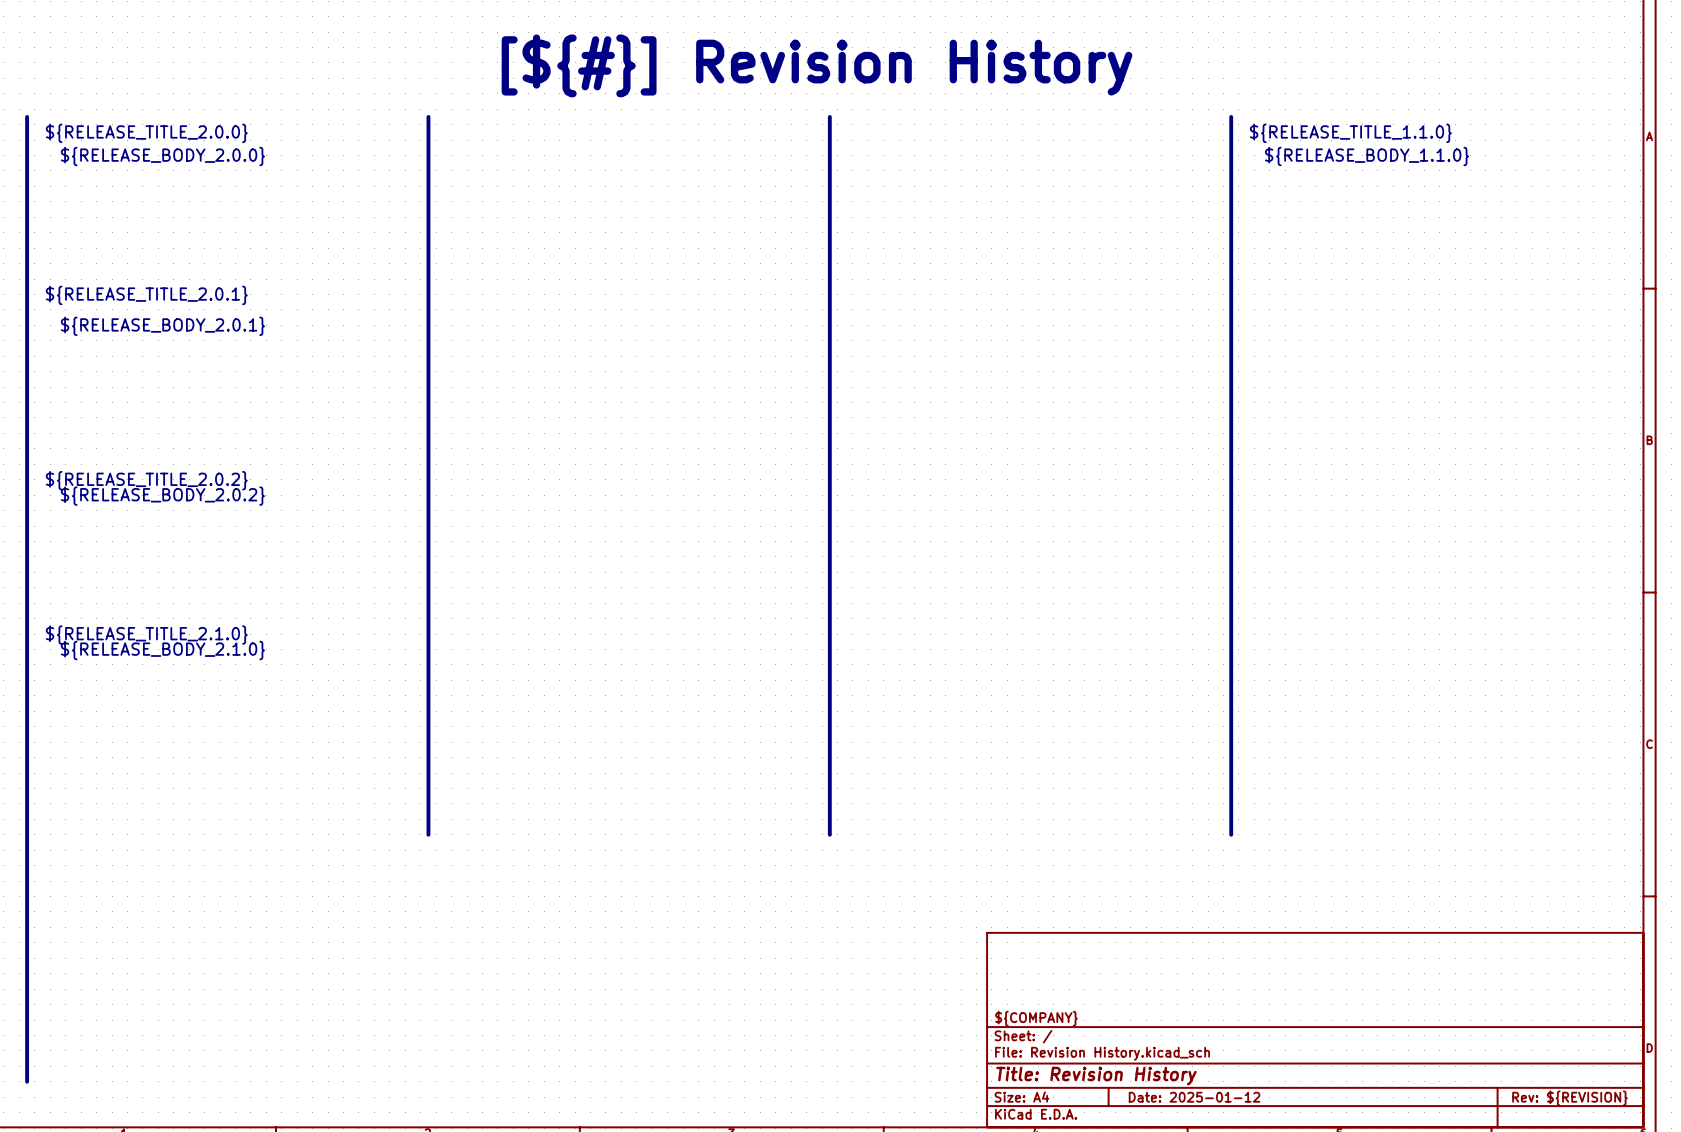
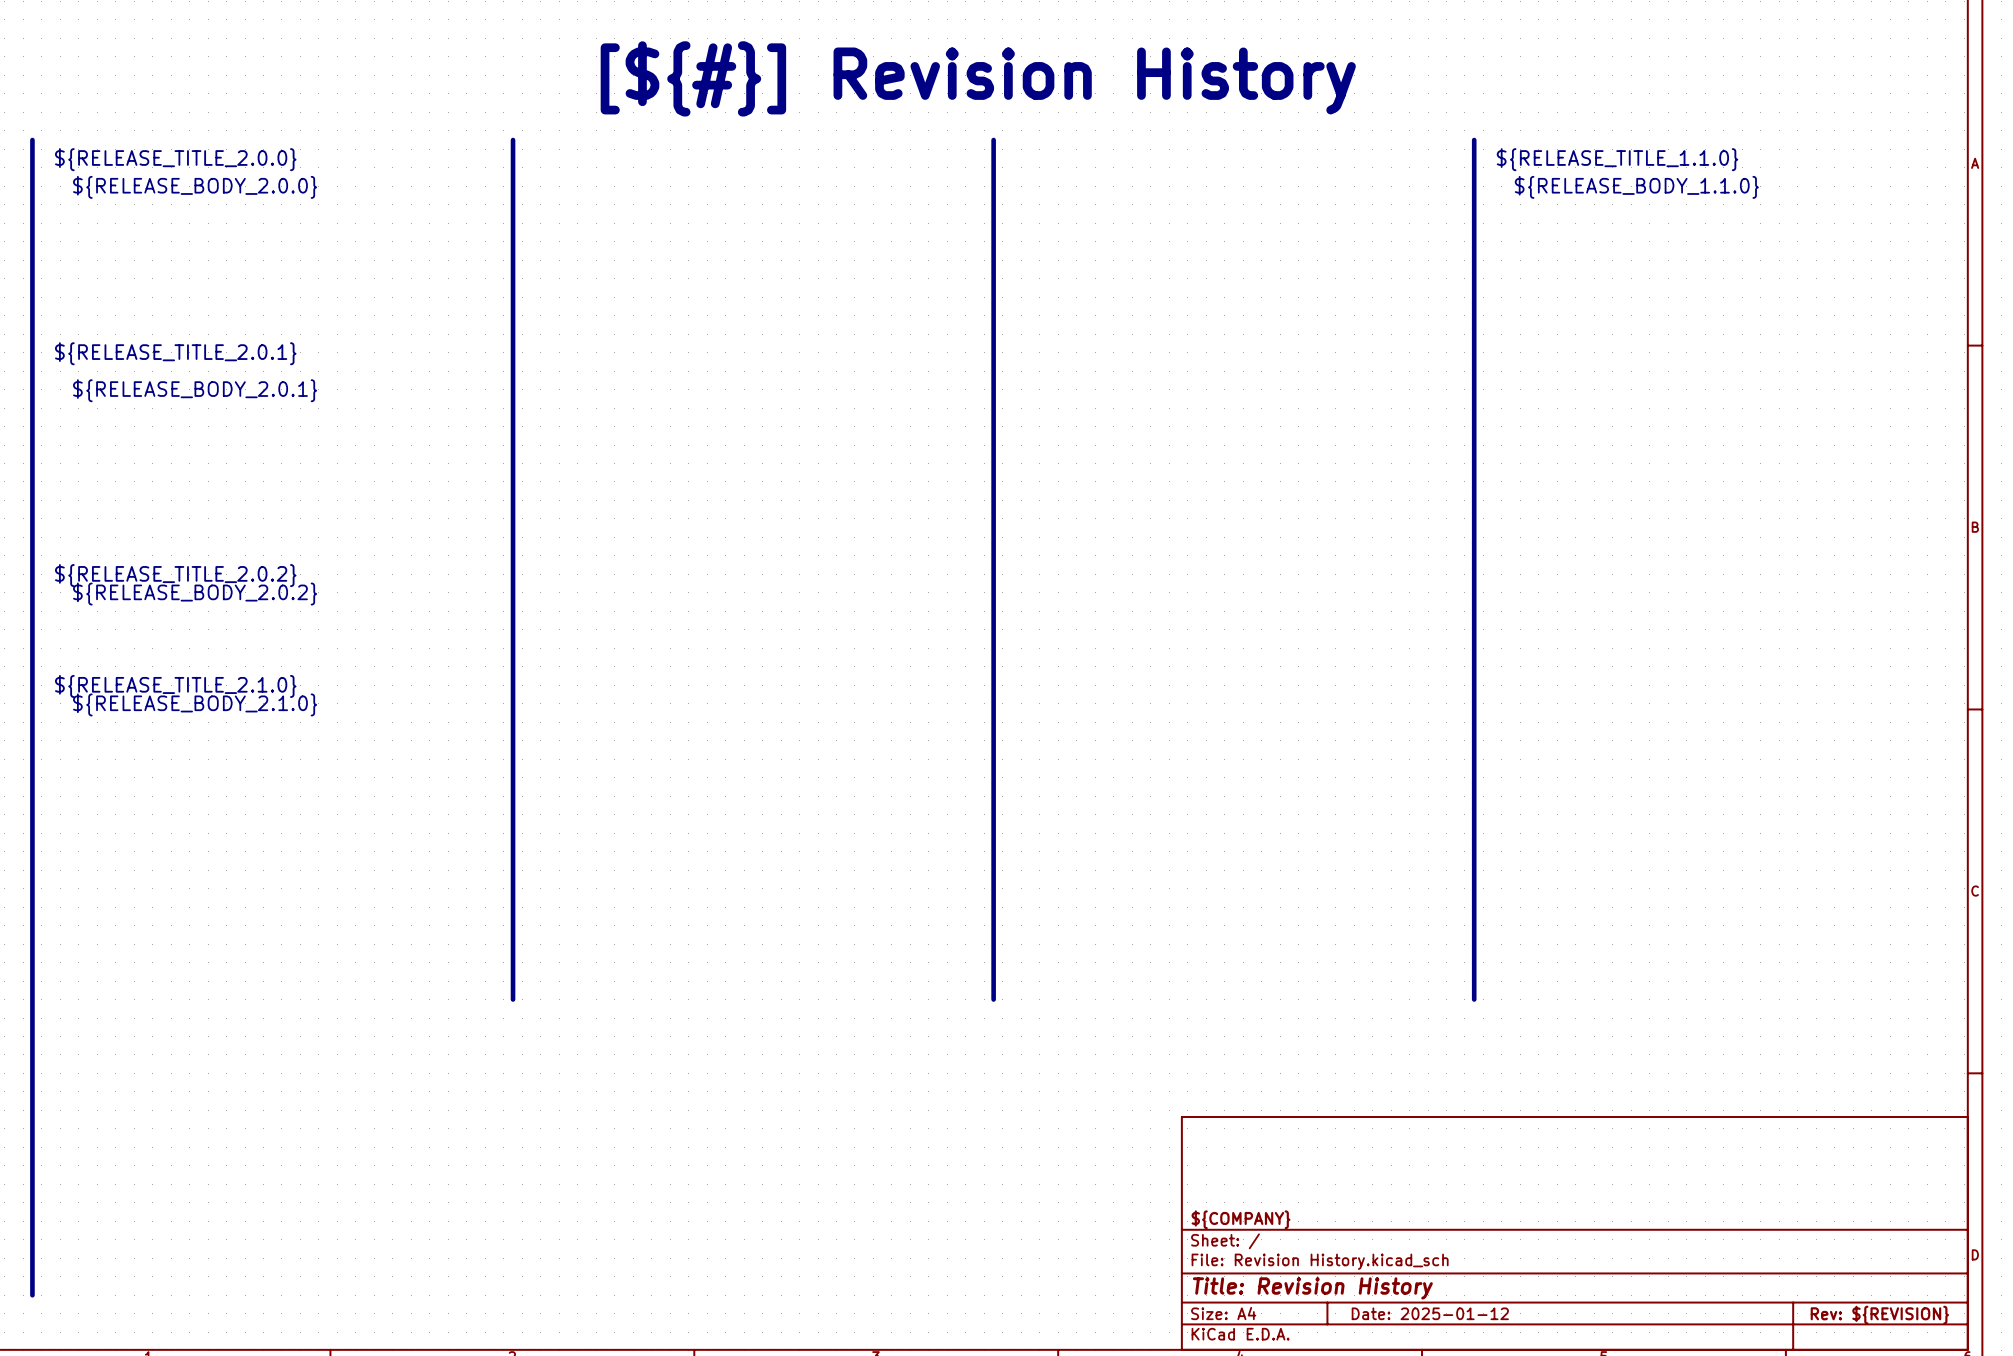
text position: ${RELEASE_TITLE_2.1.0} (146, 635) -> ${RELEASE_TITLE_2.1.0} (175, 686)
text position: ${RELEASE_BODY_2.1.0} (162, 650) -> ${RELEASE_BODY_2.1.0} (195, 704)

